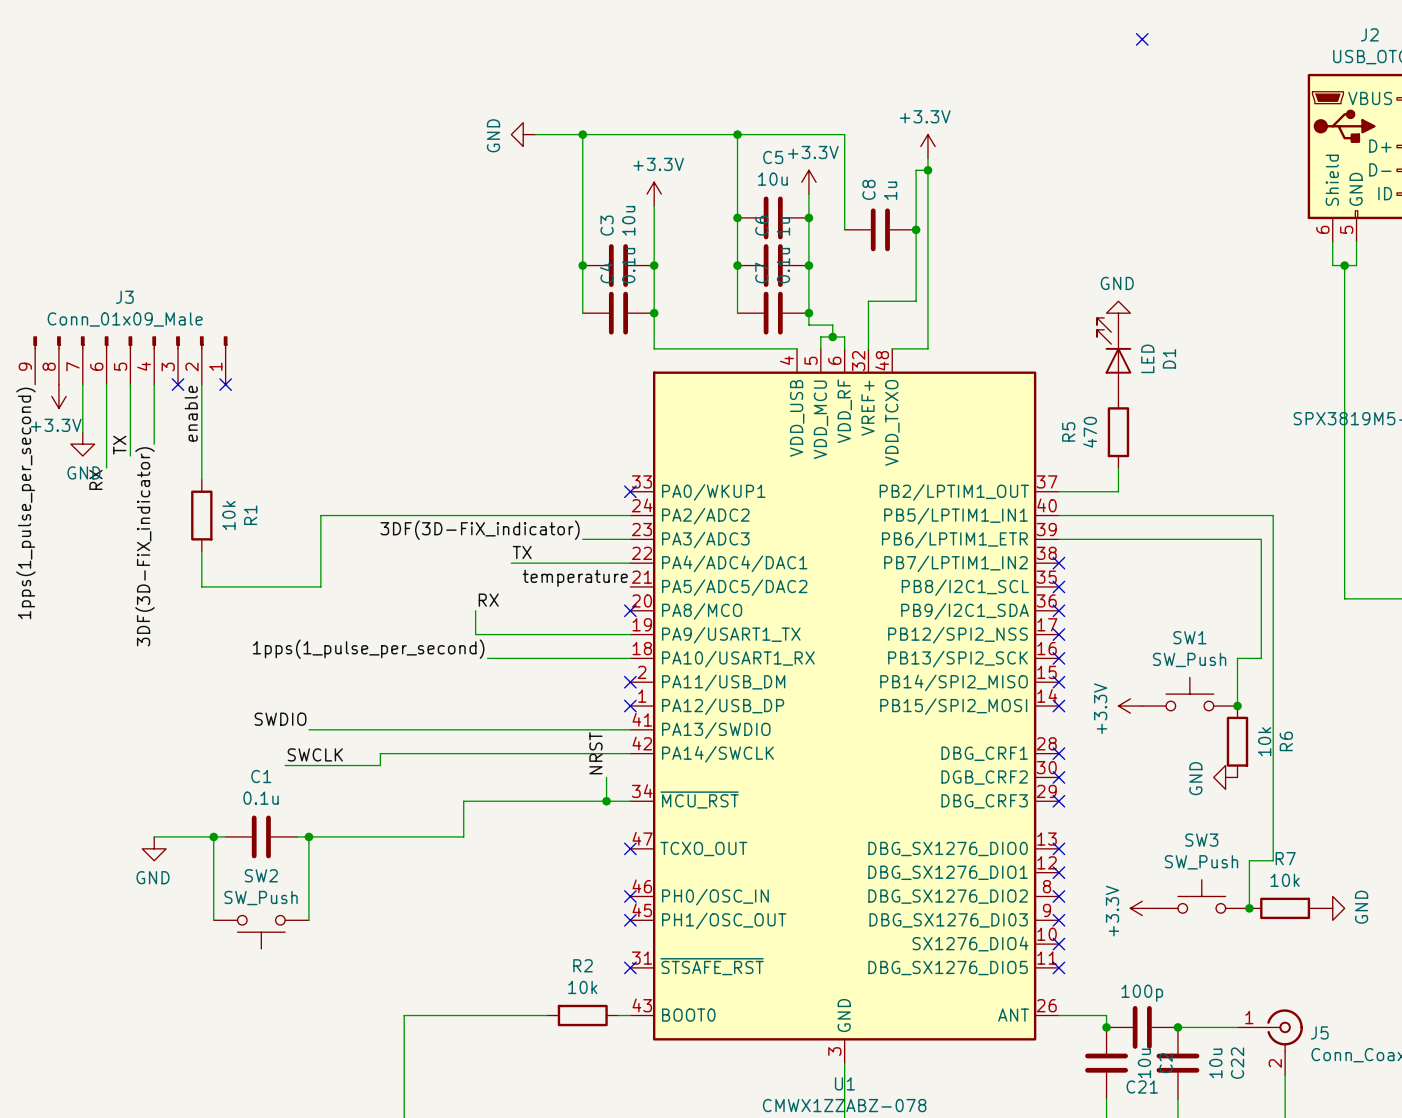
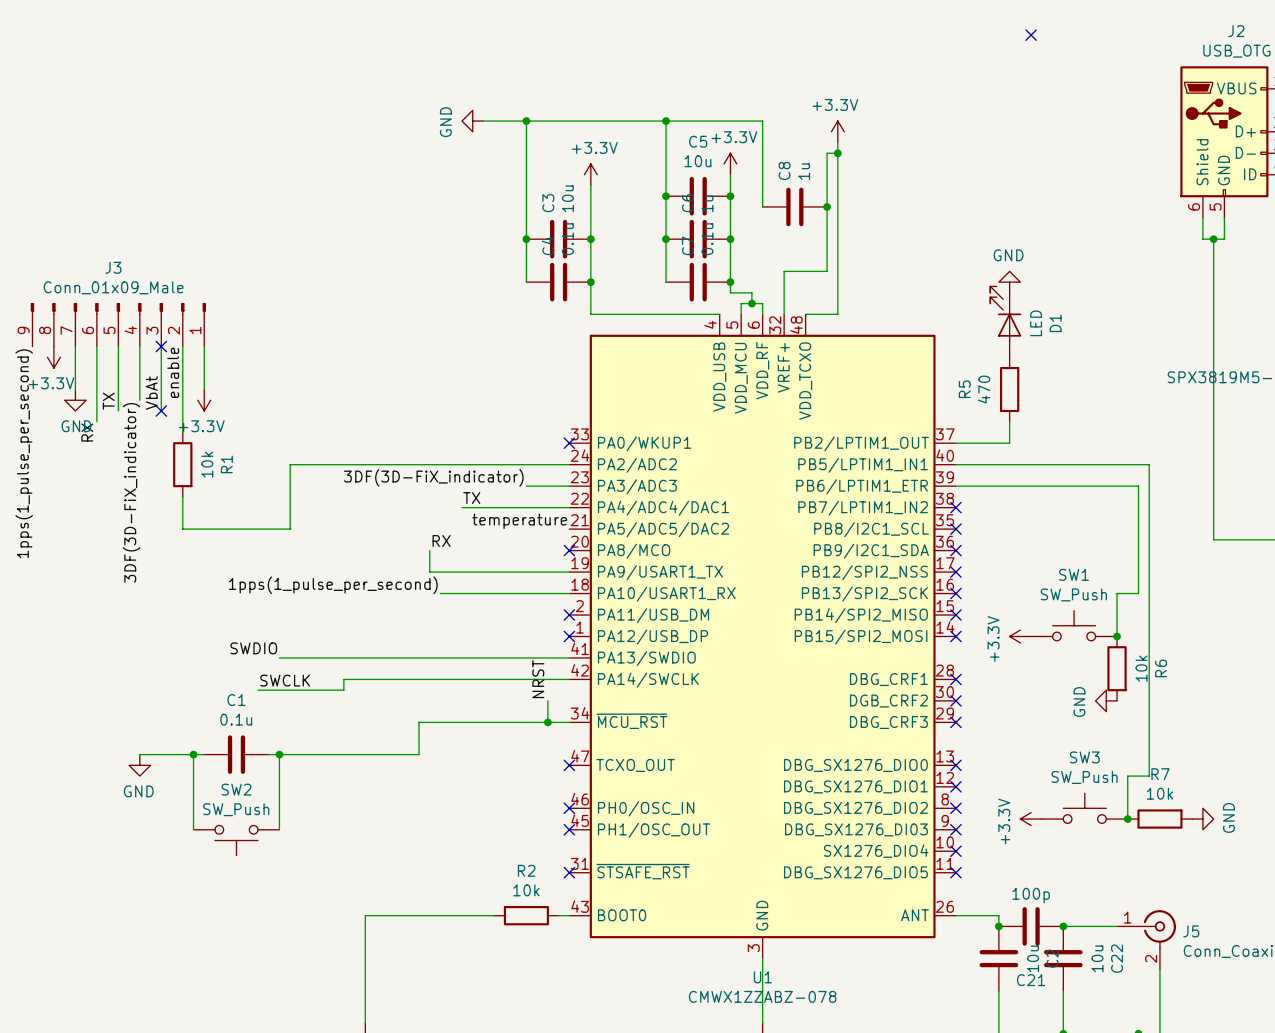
wire: none -> (161, 346) (161, 410)
wire: none -> (204, 346) (204, 389)
no-connect mark: (225, 384) -> none
label: none -> VbAt (151, 393)
power symbol: none -> +3.3V (204, 400)
no-connect mark: none -> (161, 410)

